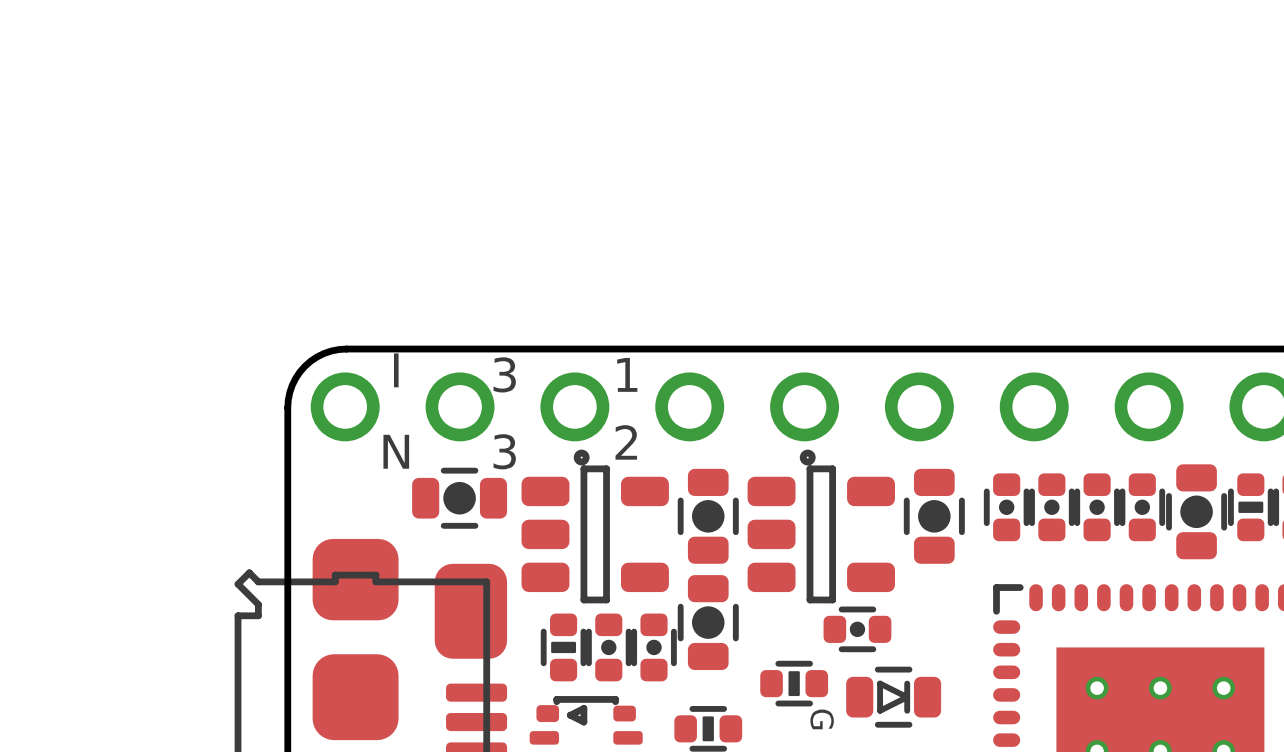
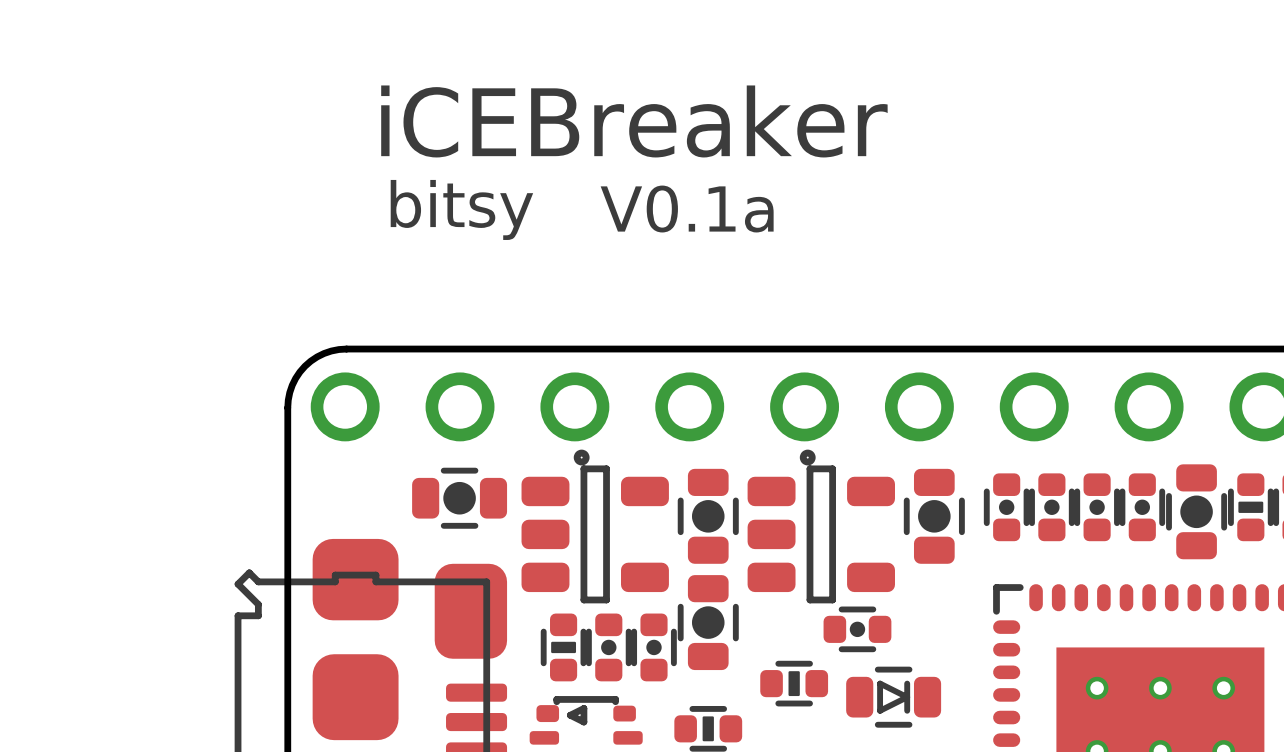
text: none -> iCEBreaker (634, 121)
text: none -> bitsy (461, 209)
text: none -> V0.1a (687, 209)
text: I (396, 370) -> none
text: 3 (504, 374) -> none
text: 1 (627, 374) -> none
text: 2 (626, 442) -> none
text: N (396, 451) -> none
text: 3 (504, 451) -> none
text: G (822, 719) -> none

